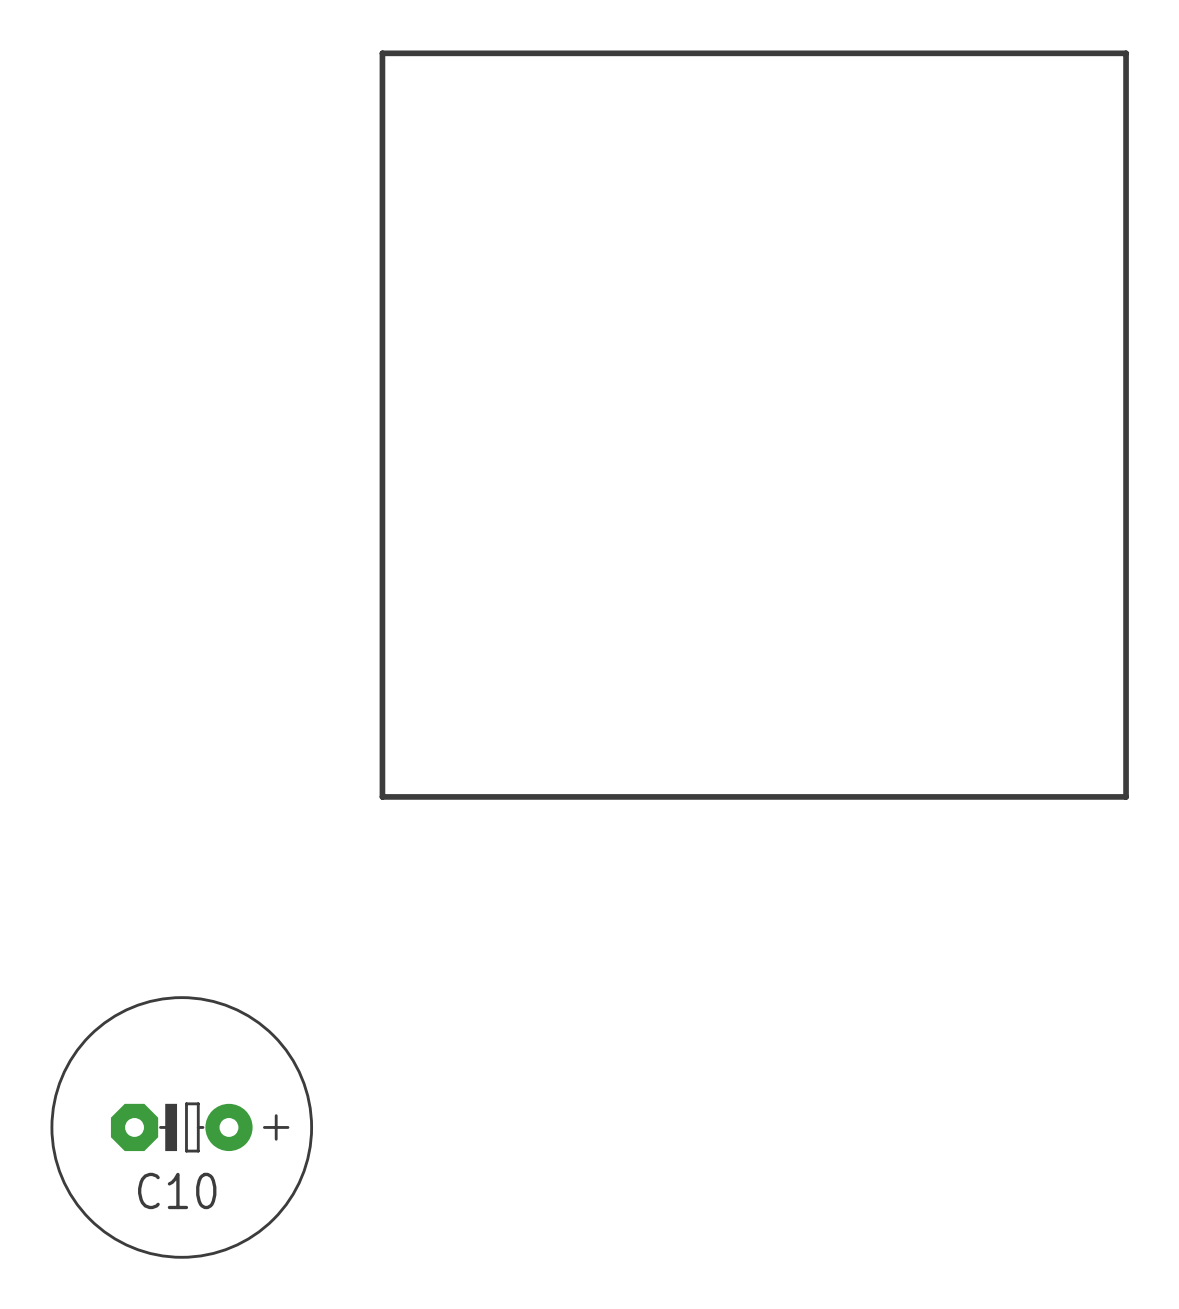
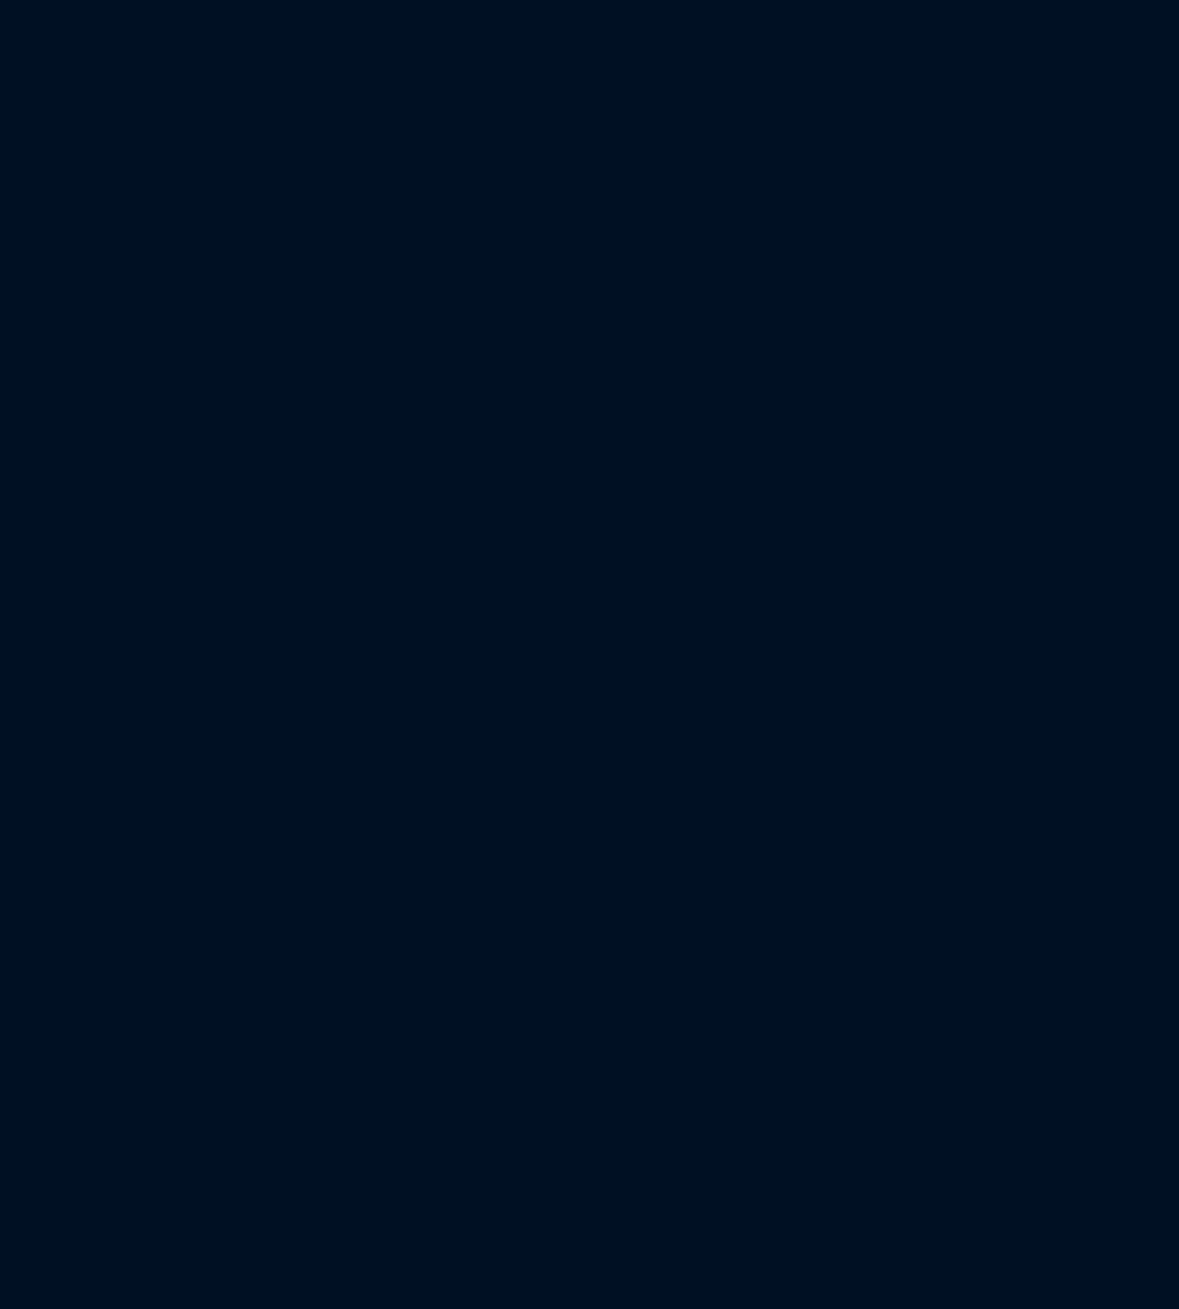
drawing: [379, 50, 1129, 800] -> none
C10: (181, 1127) -> none

